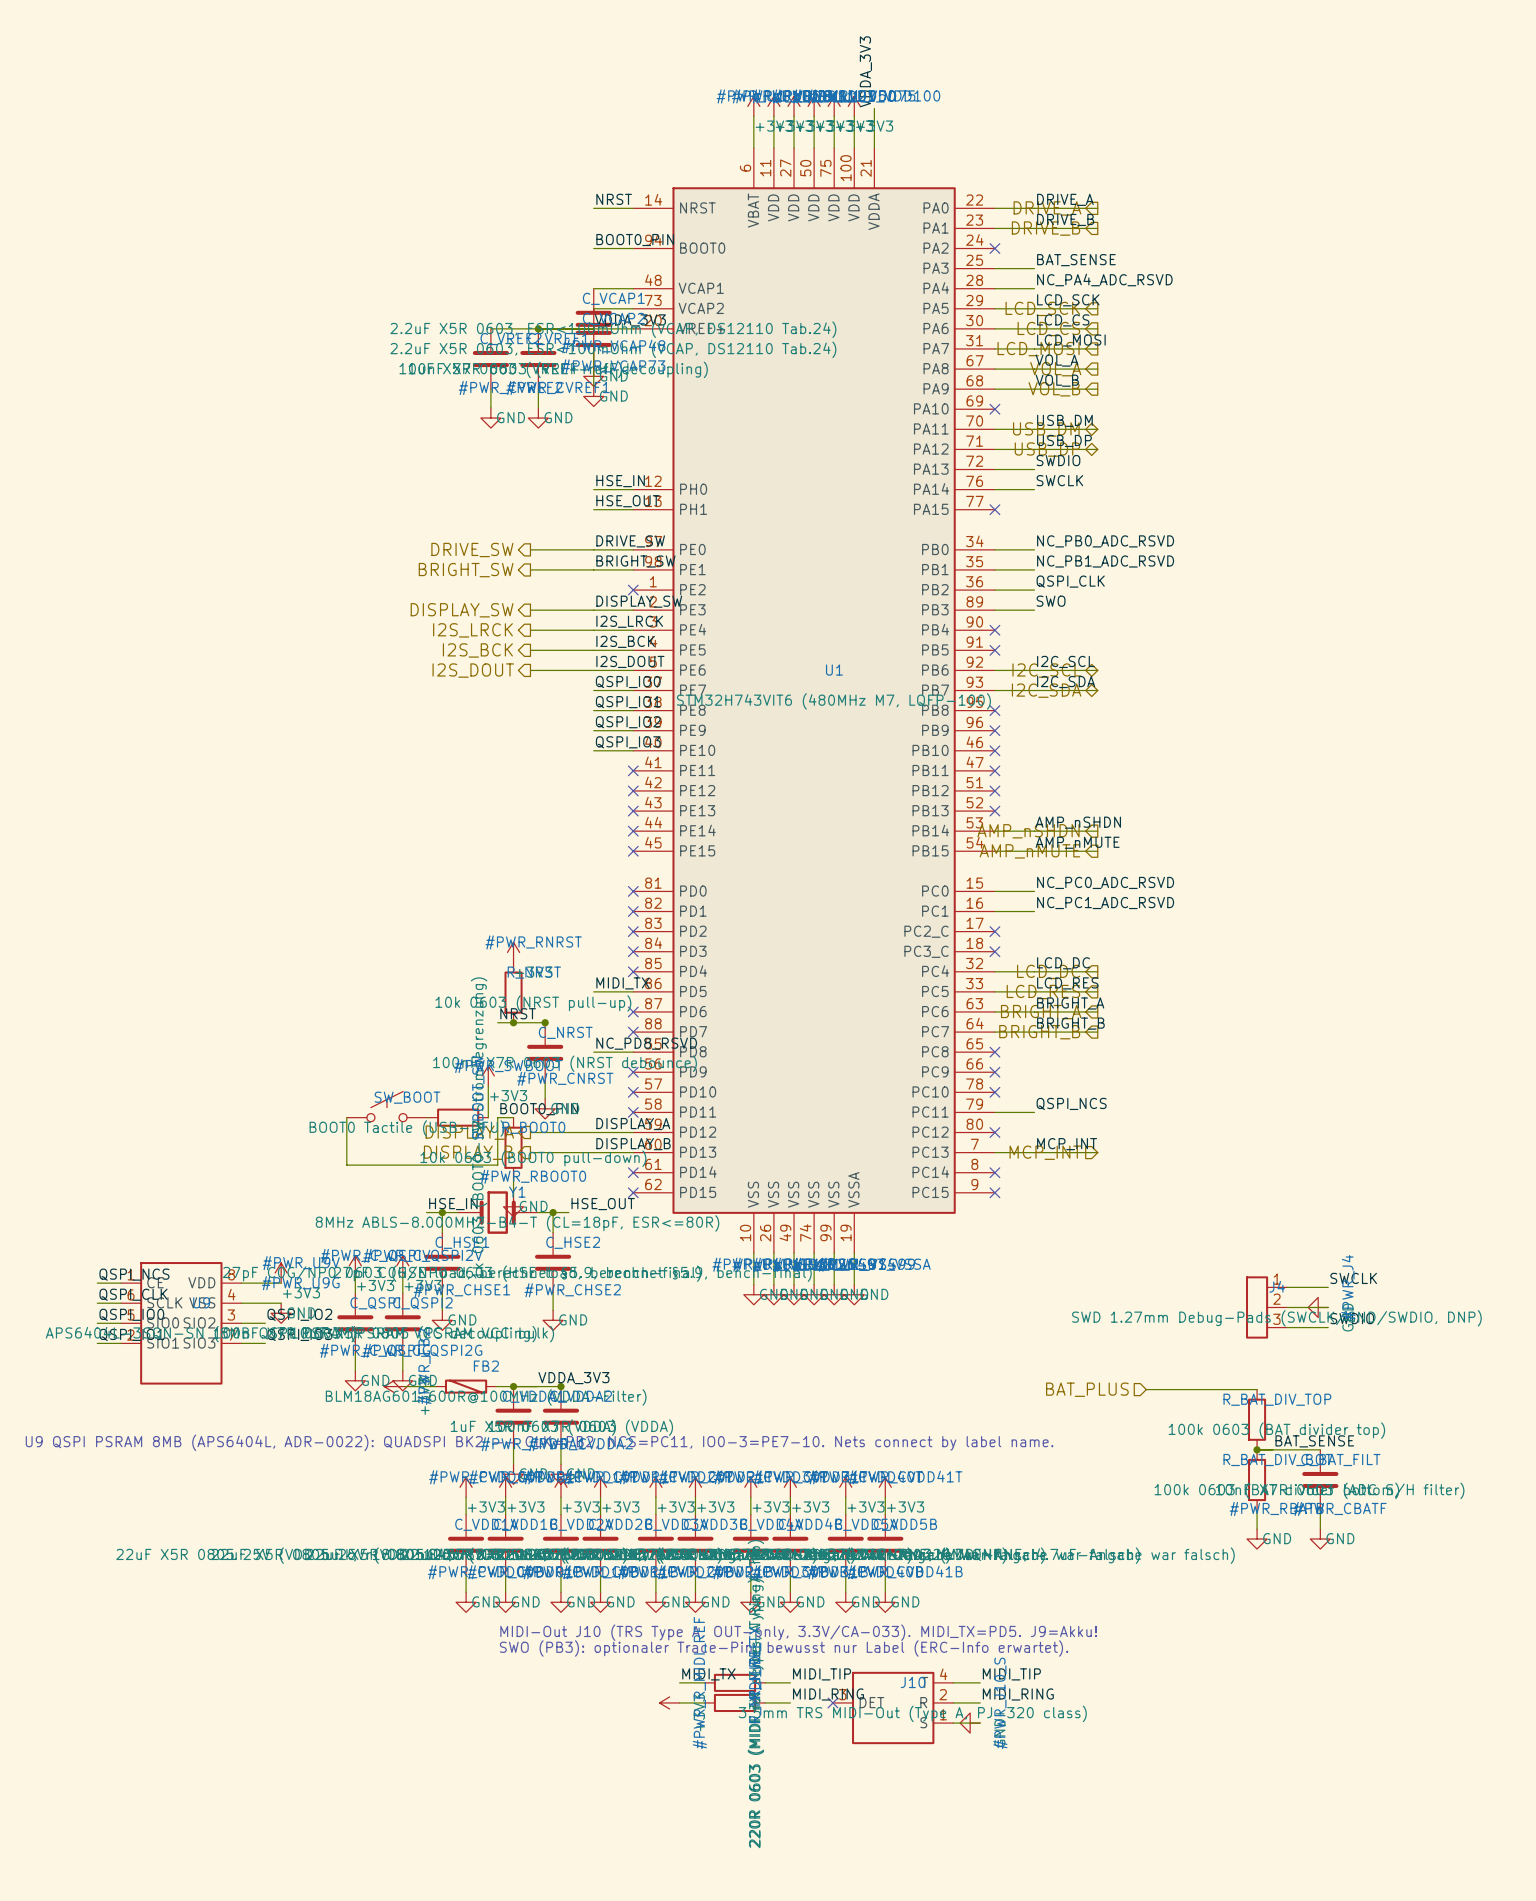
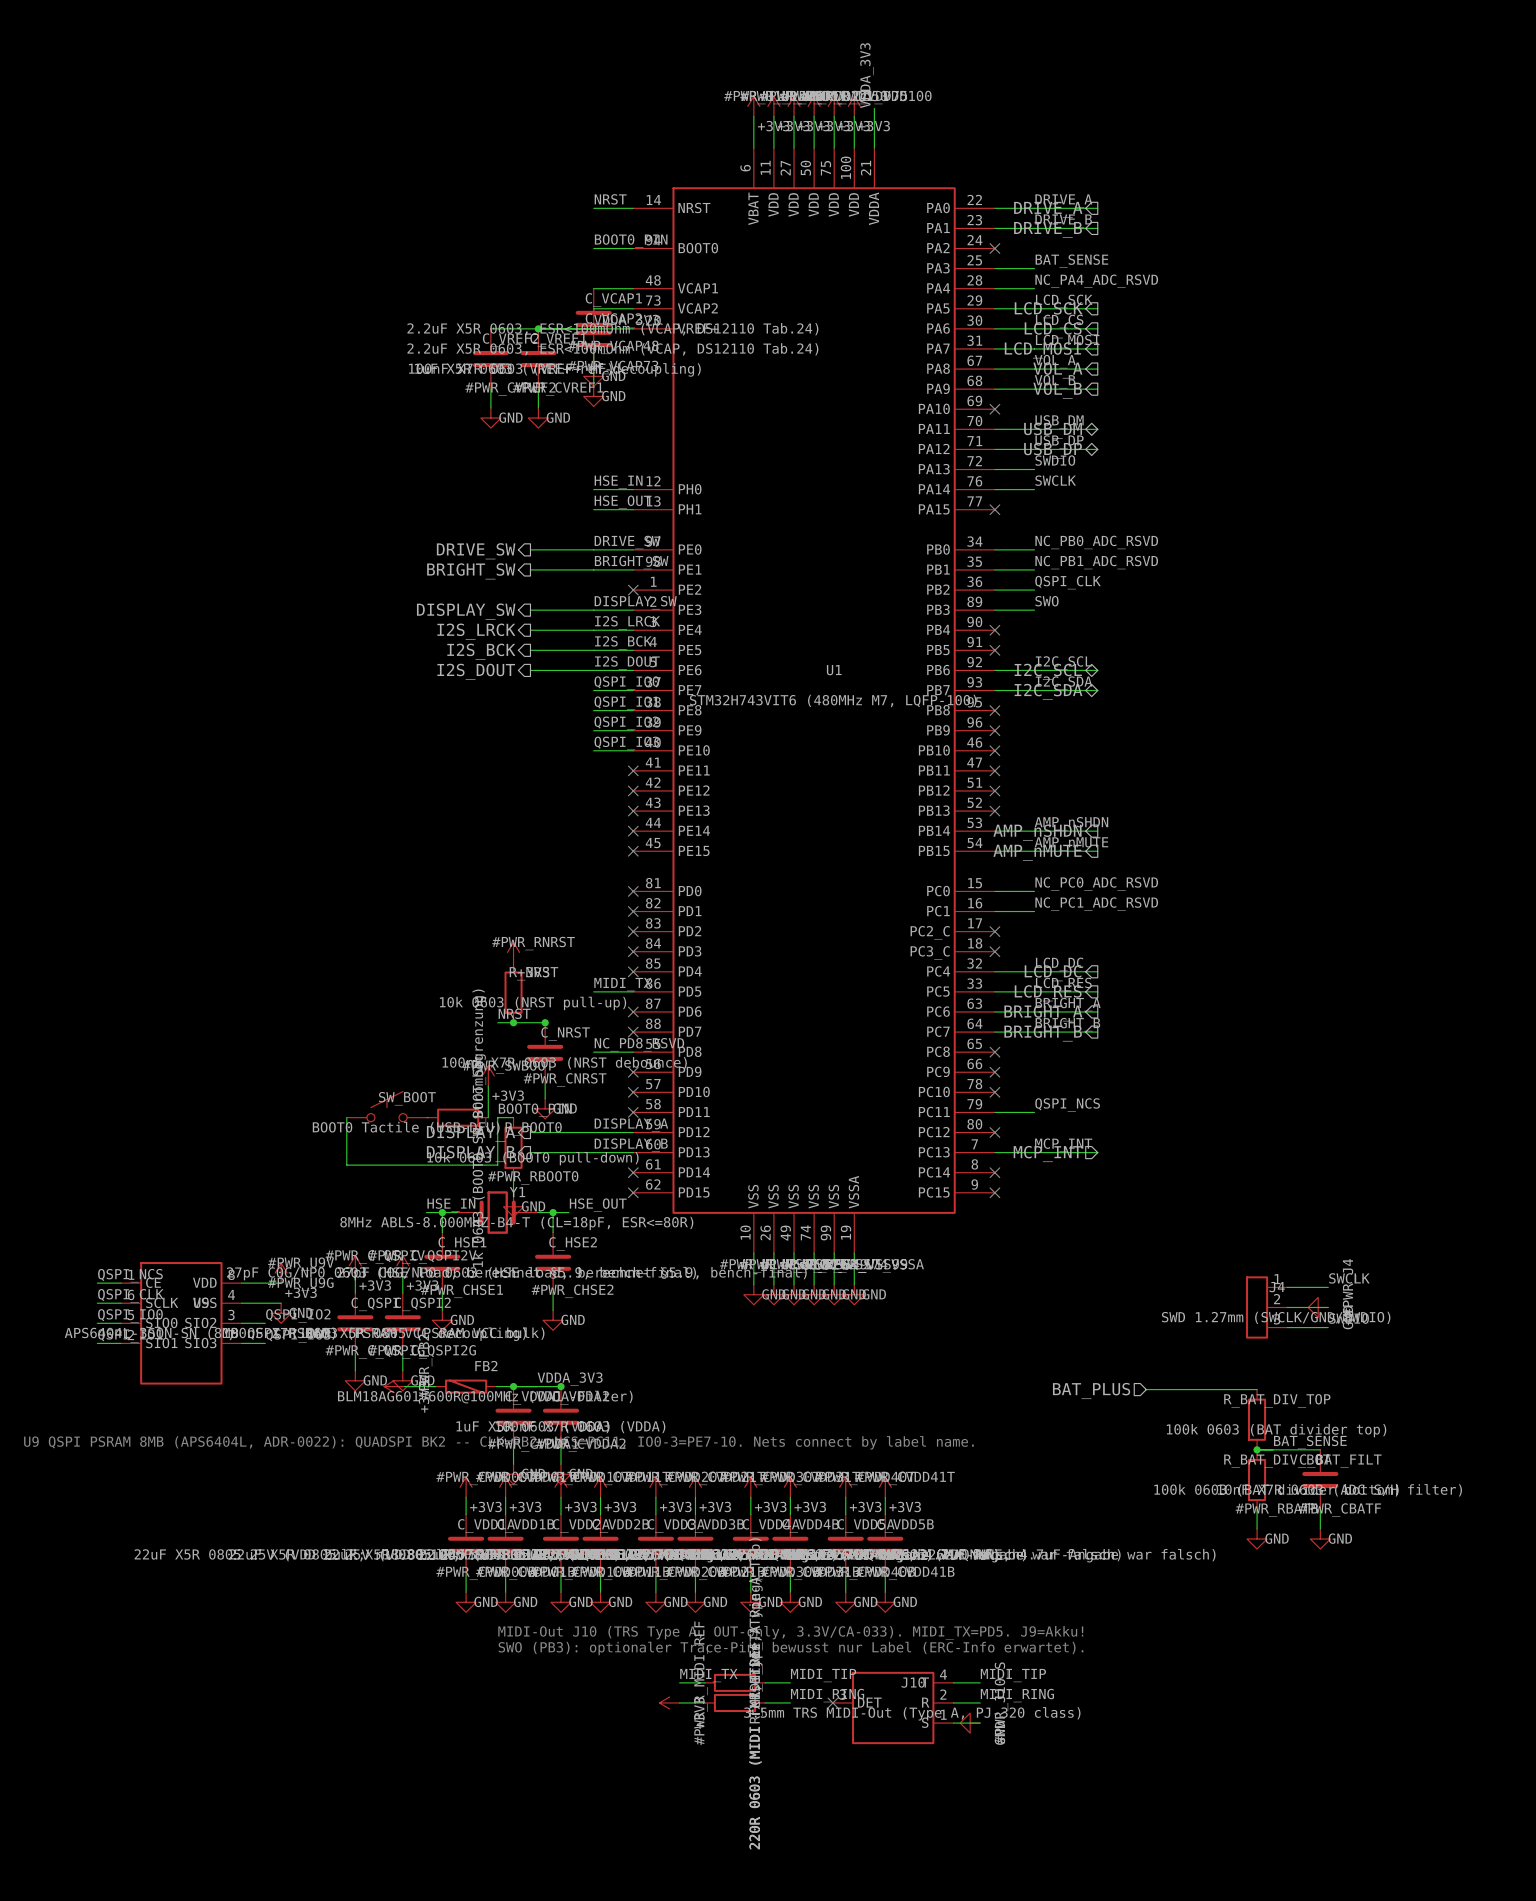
J4 value: SWD 1.27mm Debug-Pads (SWCLK/GND/SWDIO, DNP) (1276, 1318) -> SWD 1.27mm (SWCLK/GND/SWDIO) (1276, 1317)

